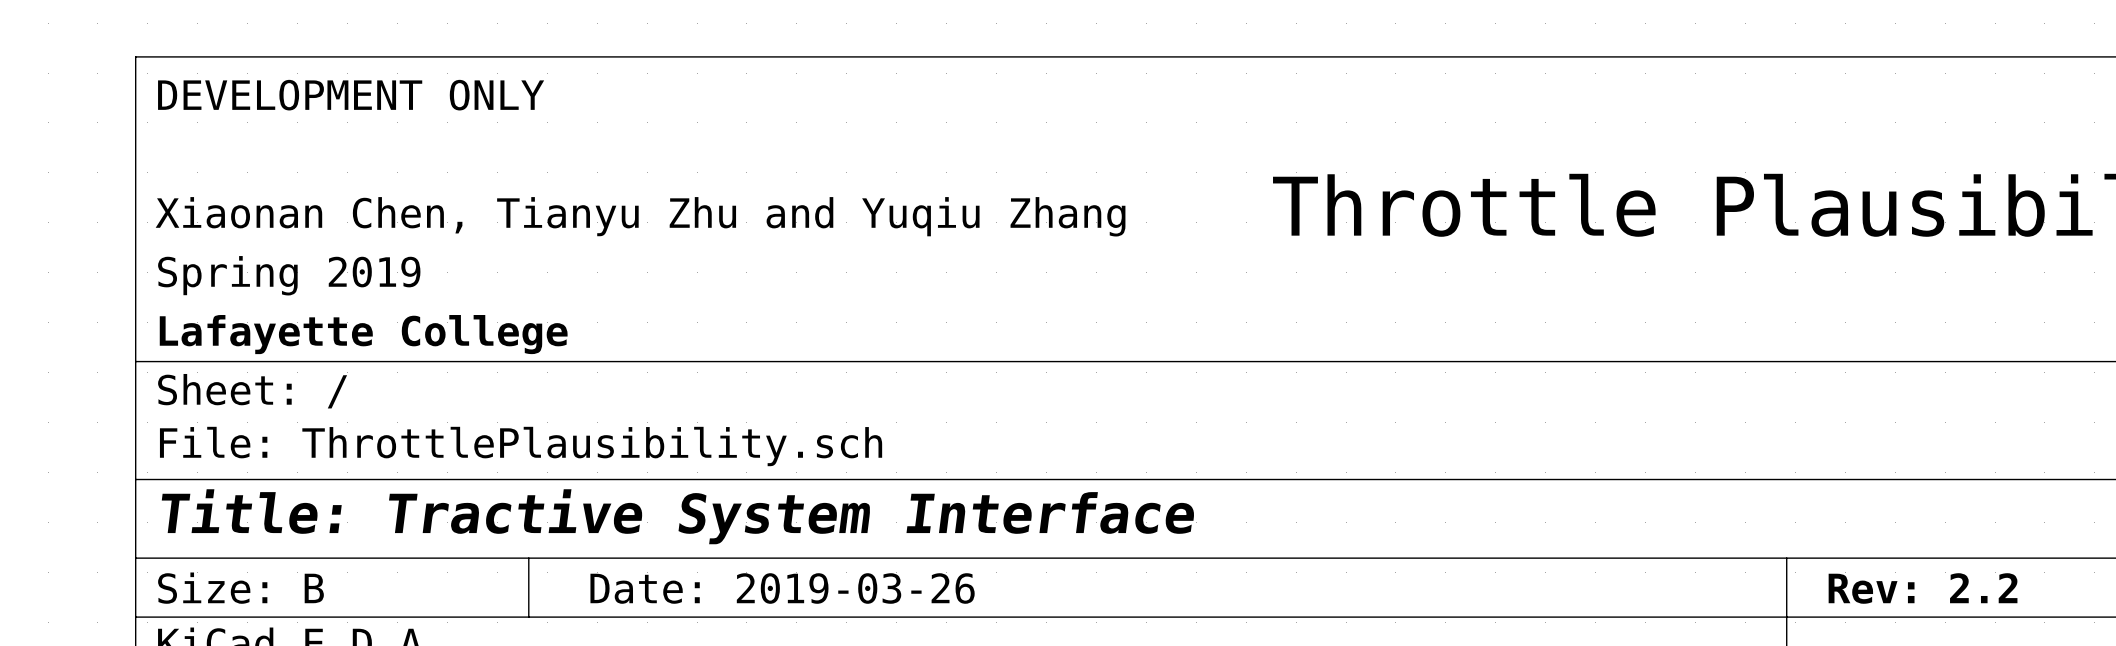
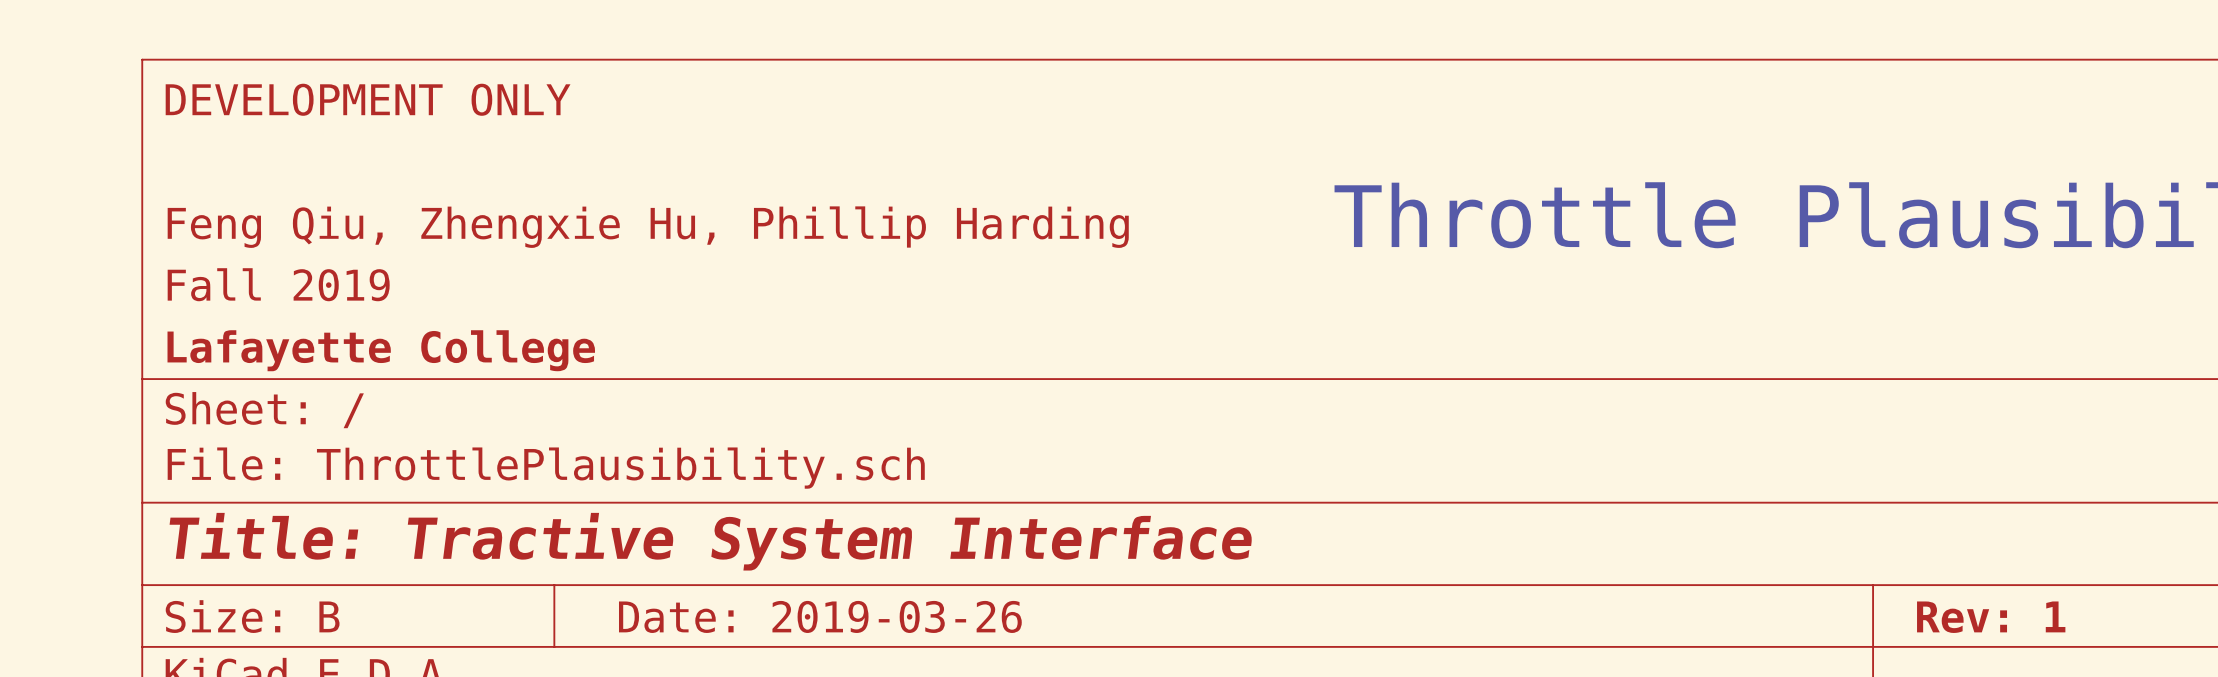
title block: Xiaonan Chen, Tianyu Zhu and Yuqiu Zhang (640, 216) -> Feng Qiu, Zhengxie Hu, Phillip Harding (648, 227)
title block: Spring 2019 (289, 275) -> Fall 2019 (278, 284)
title block: Rev: 2.2 (1923, 588) -> Rev: 1 (1991, 617)

